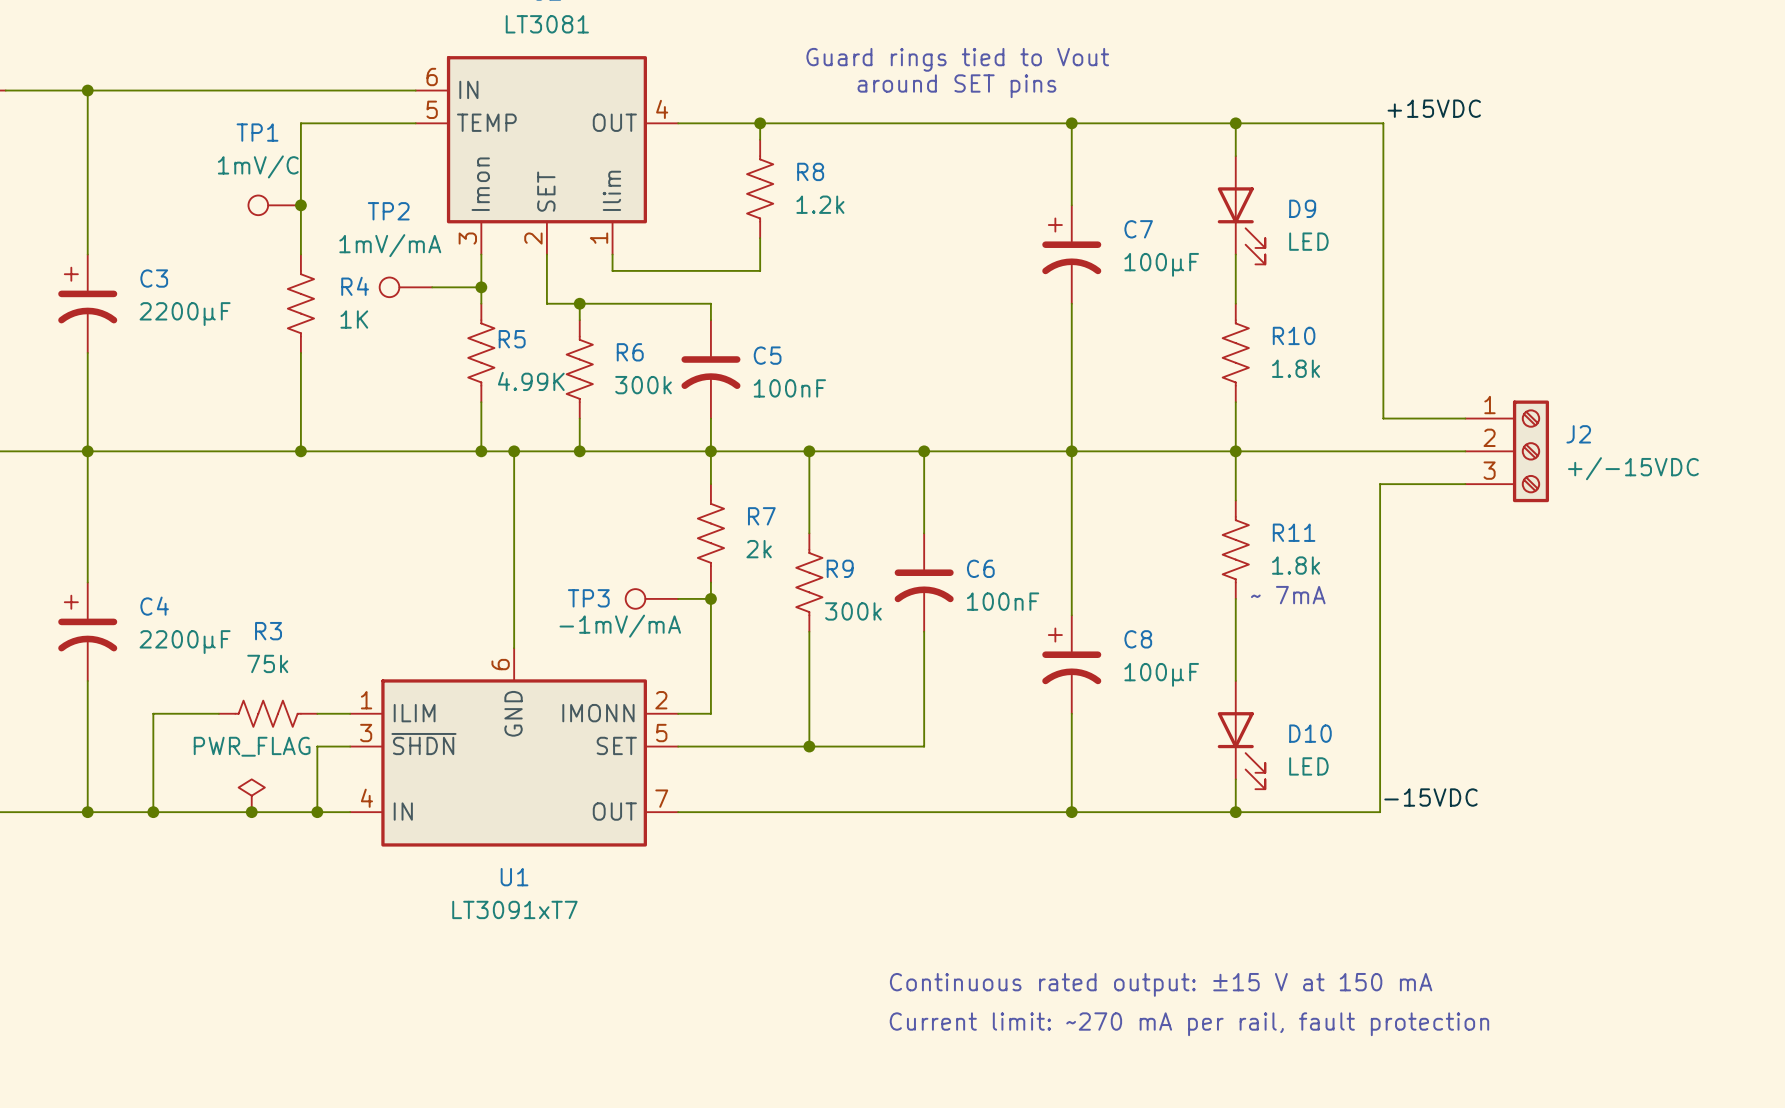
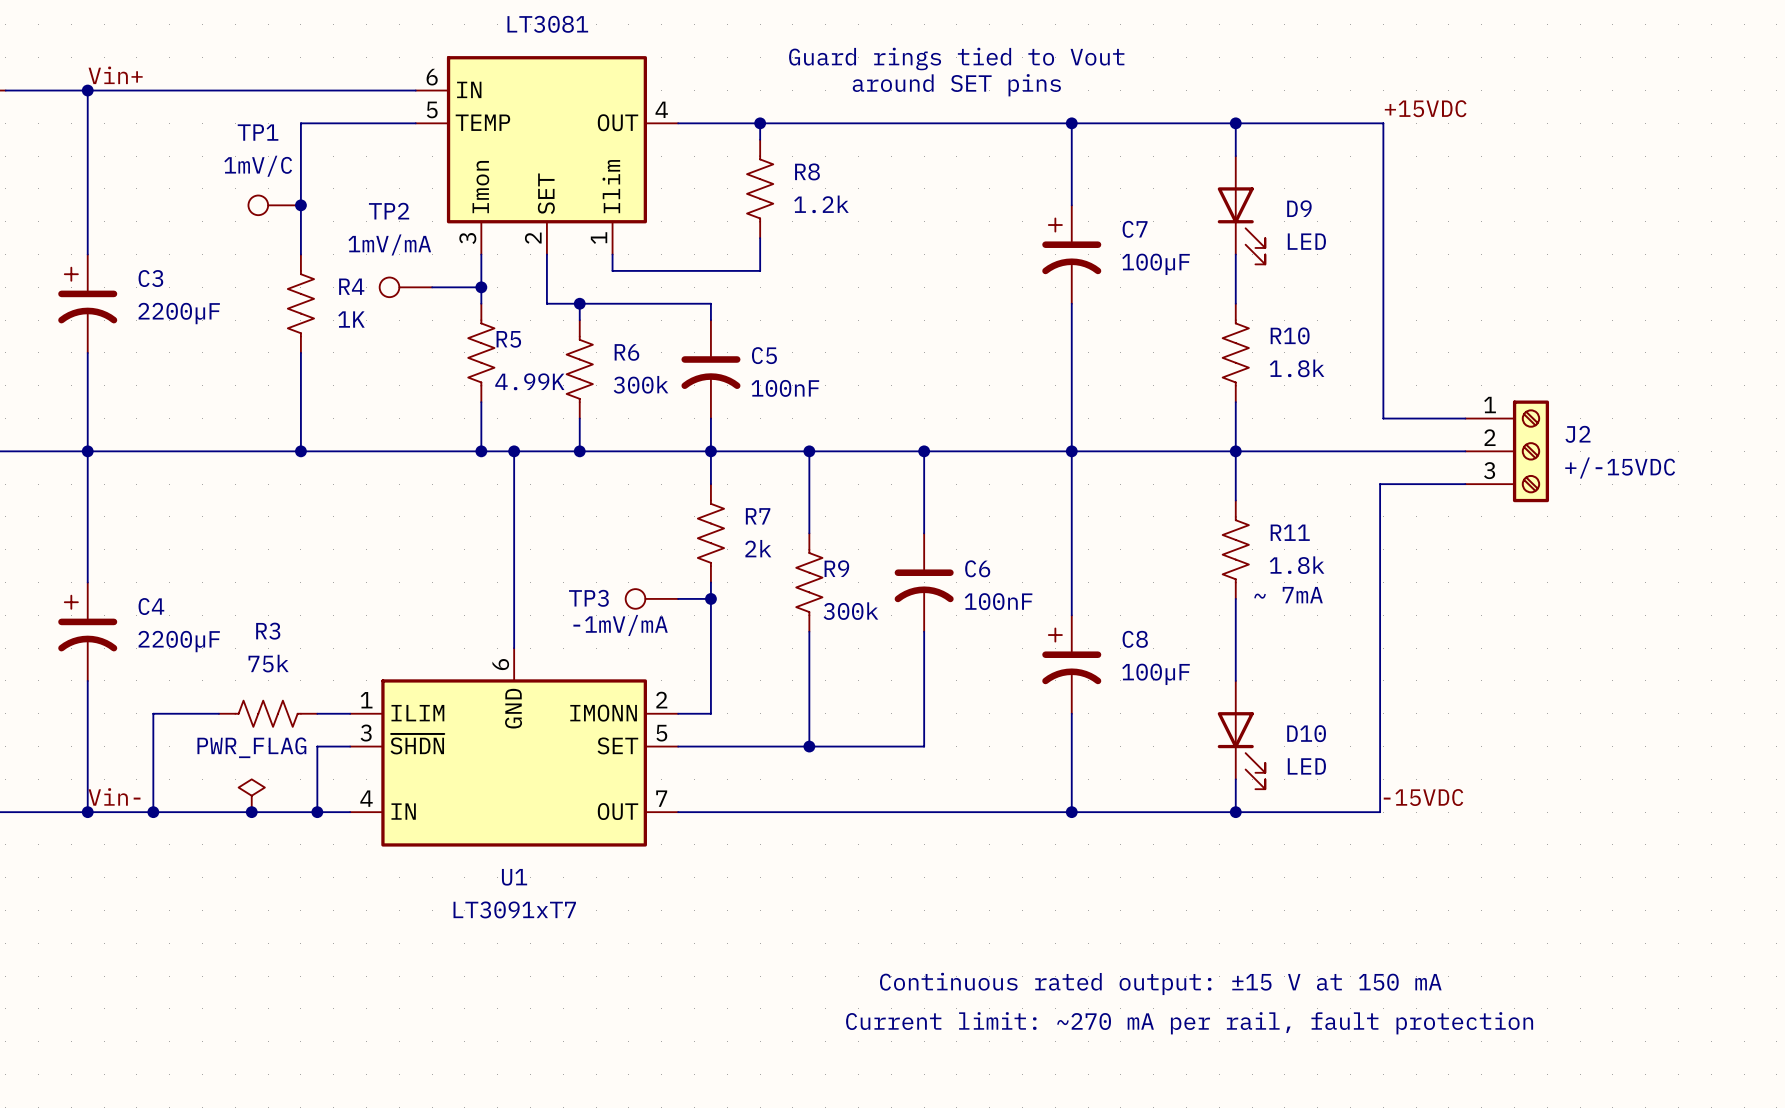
label: none -> Vin+ (115, 75)
label: none -> Vin- (114, 796)

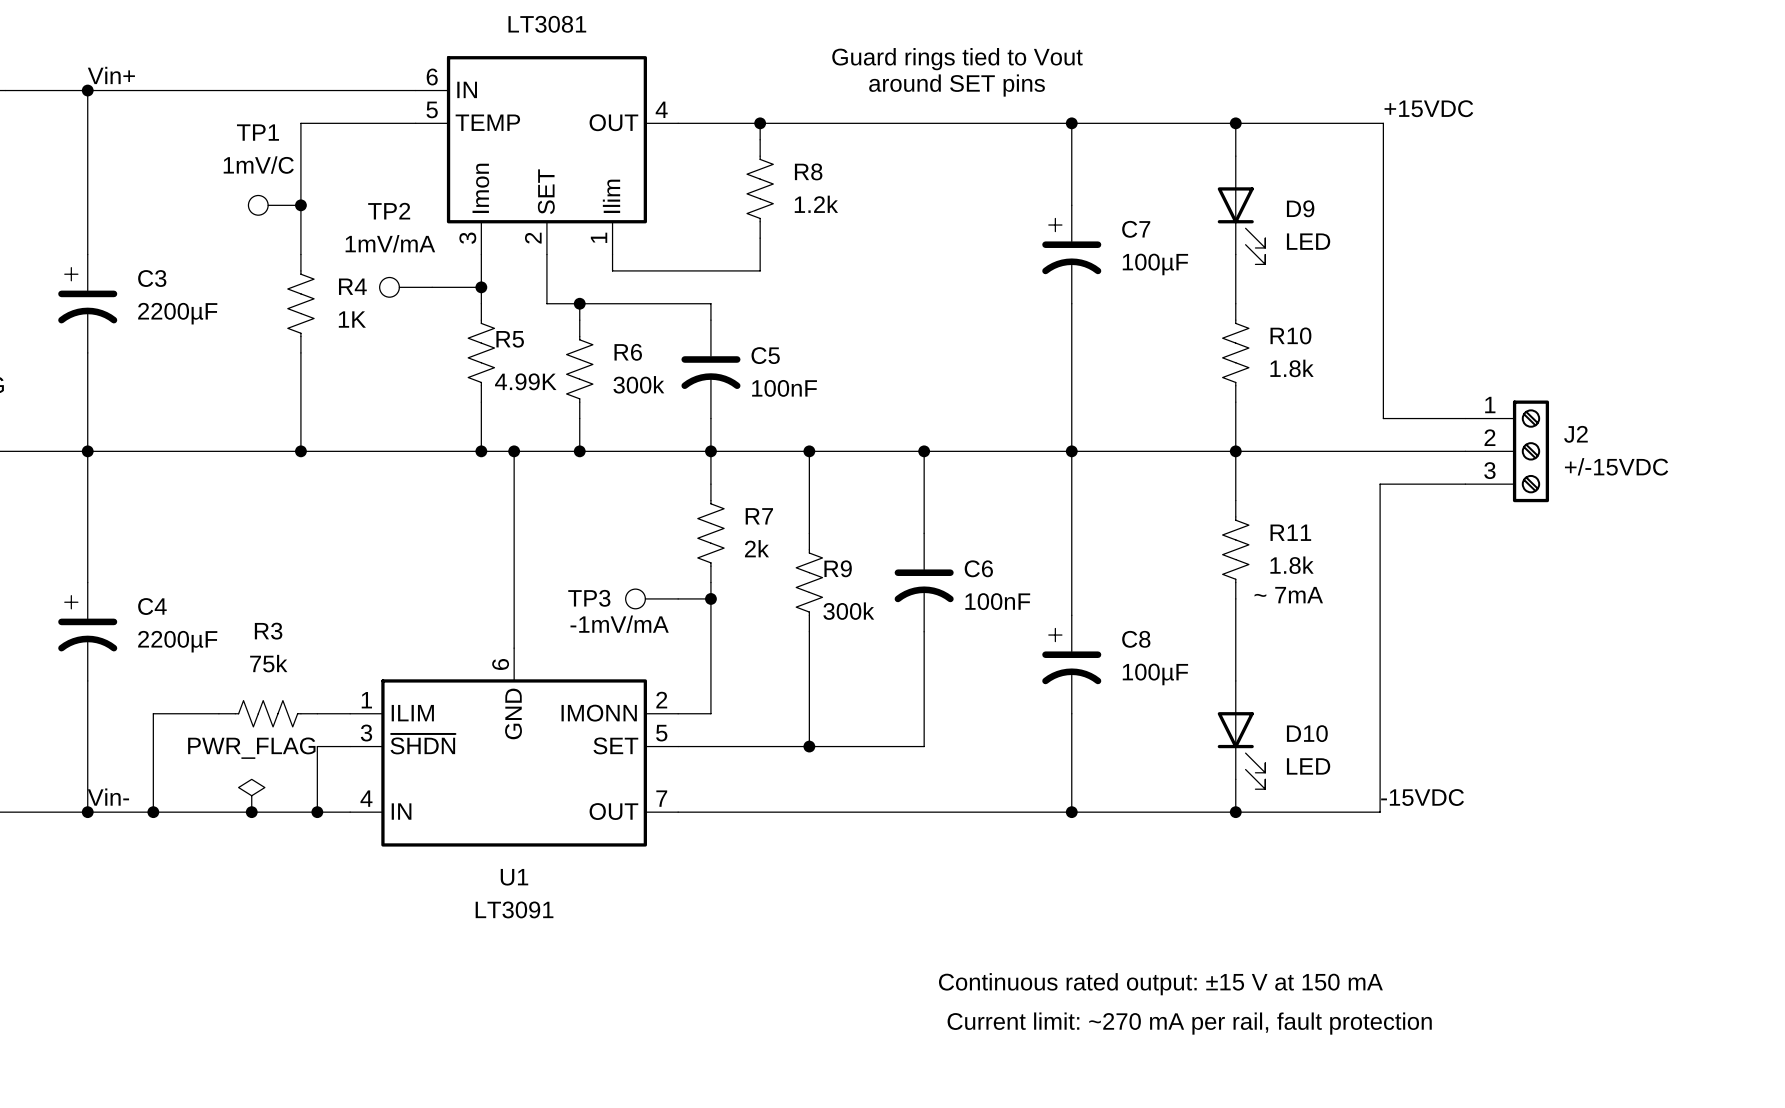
U1 value: LT3091xT7 (514, 909) -> LT3091 (514, 909)

